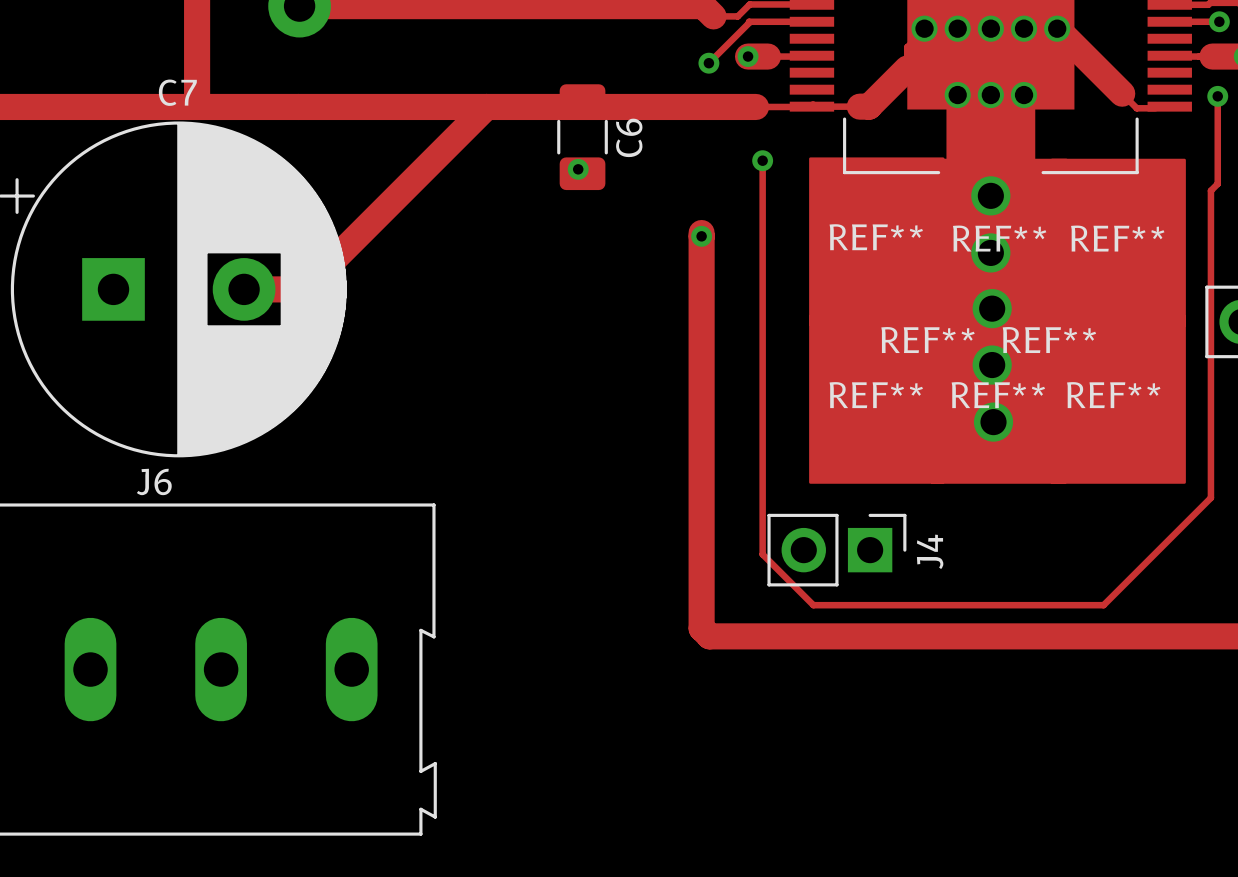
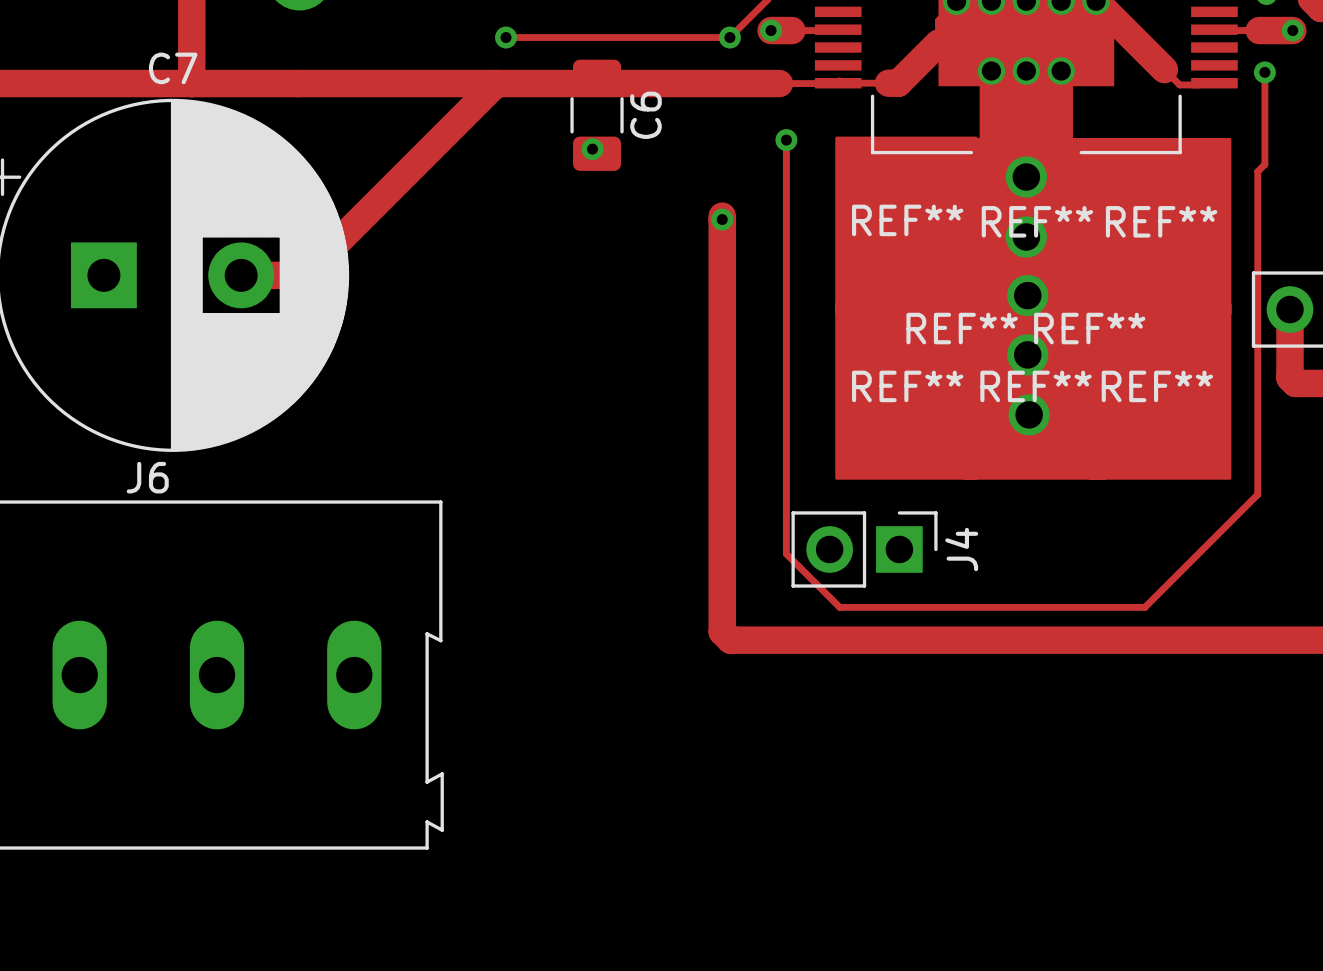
track: none -> (506, 37) (729, 37)
via: none -> (506, 37)

